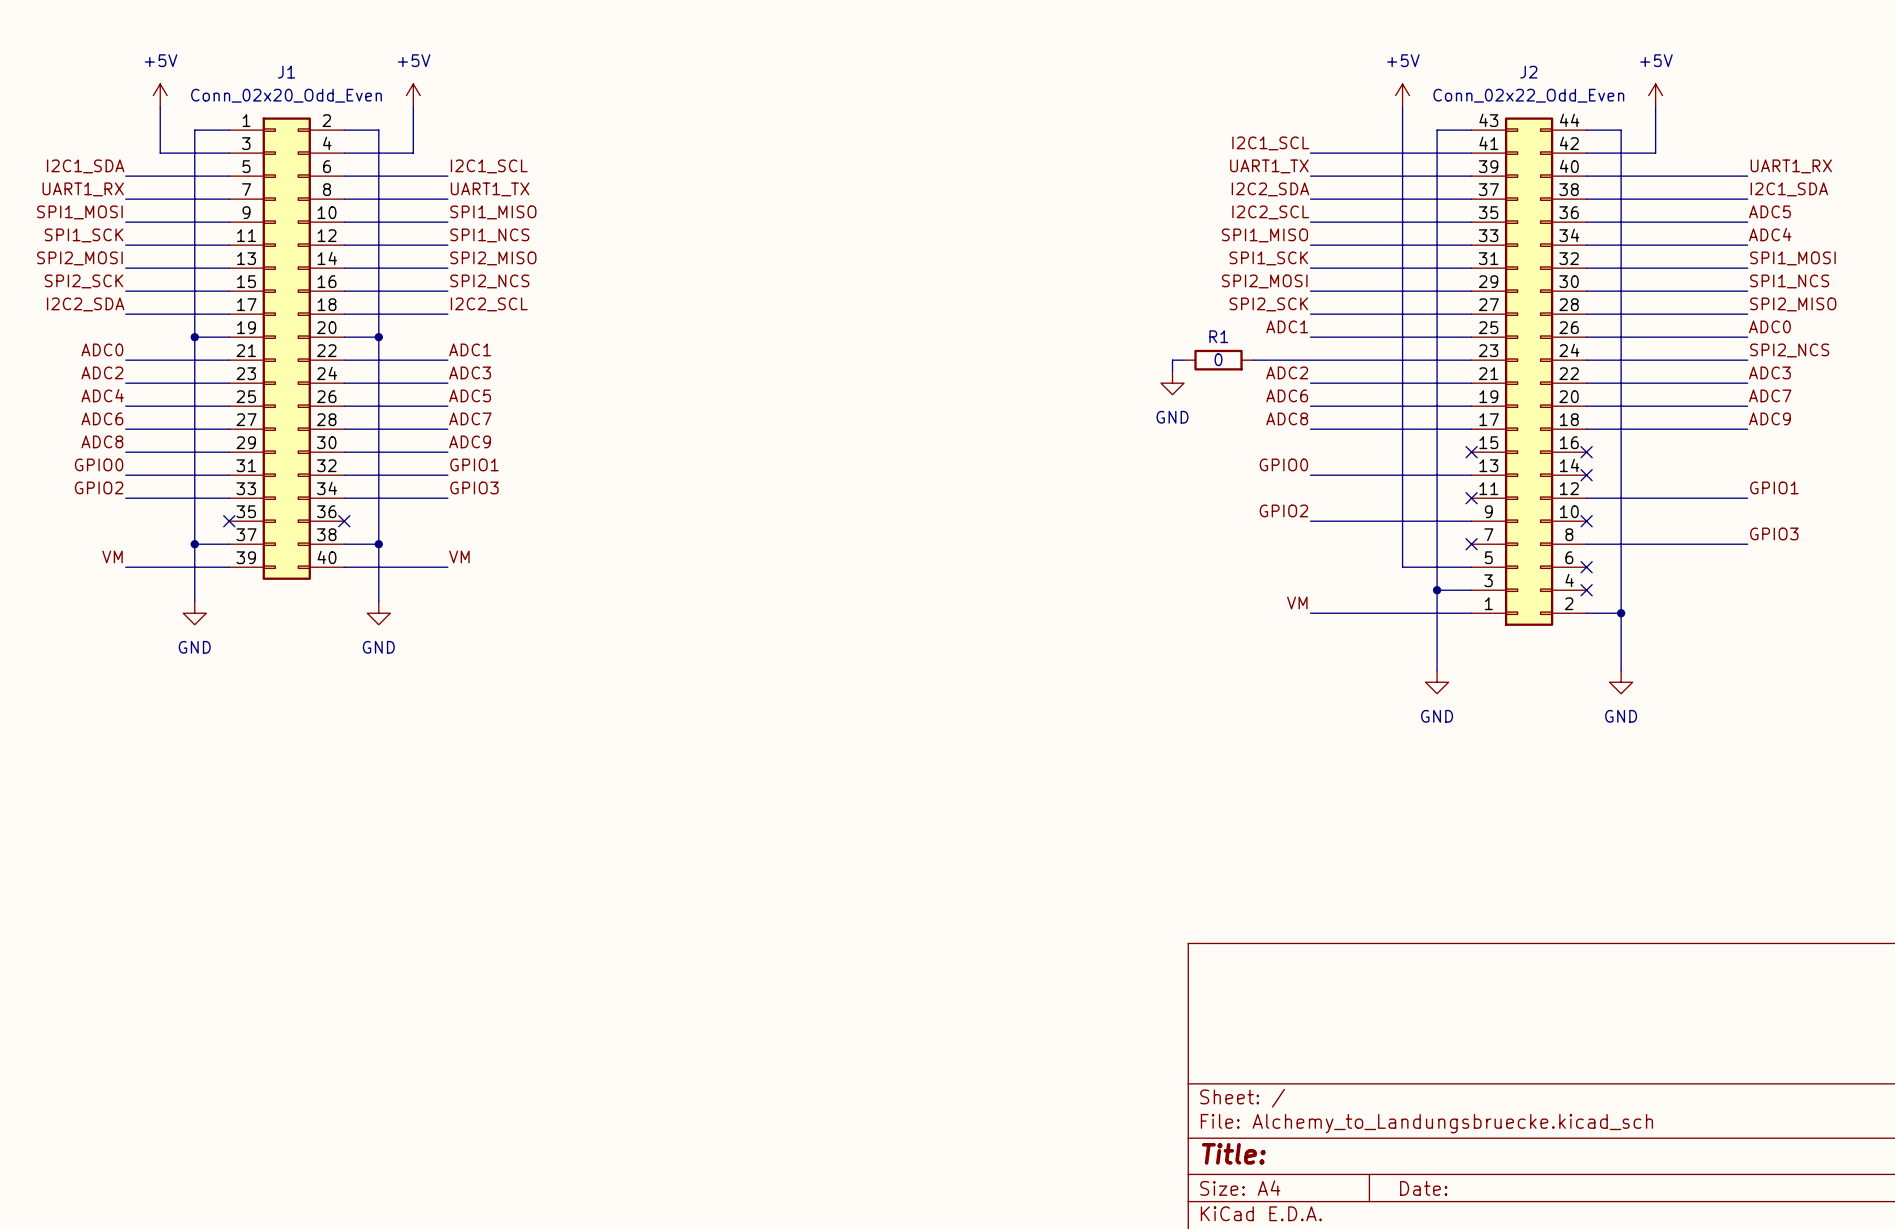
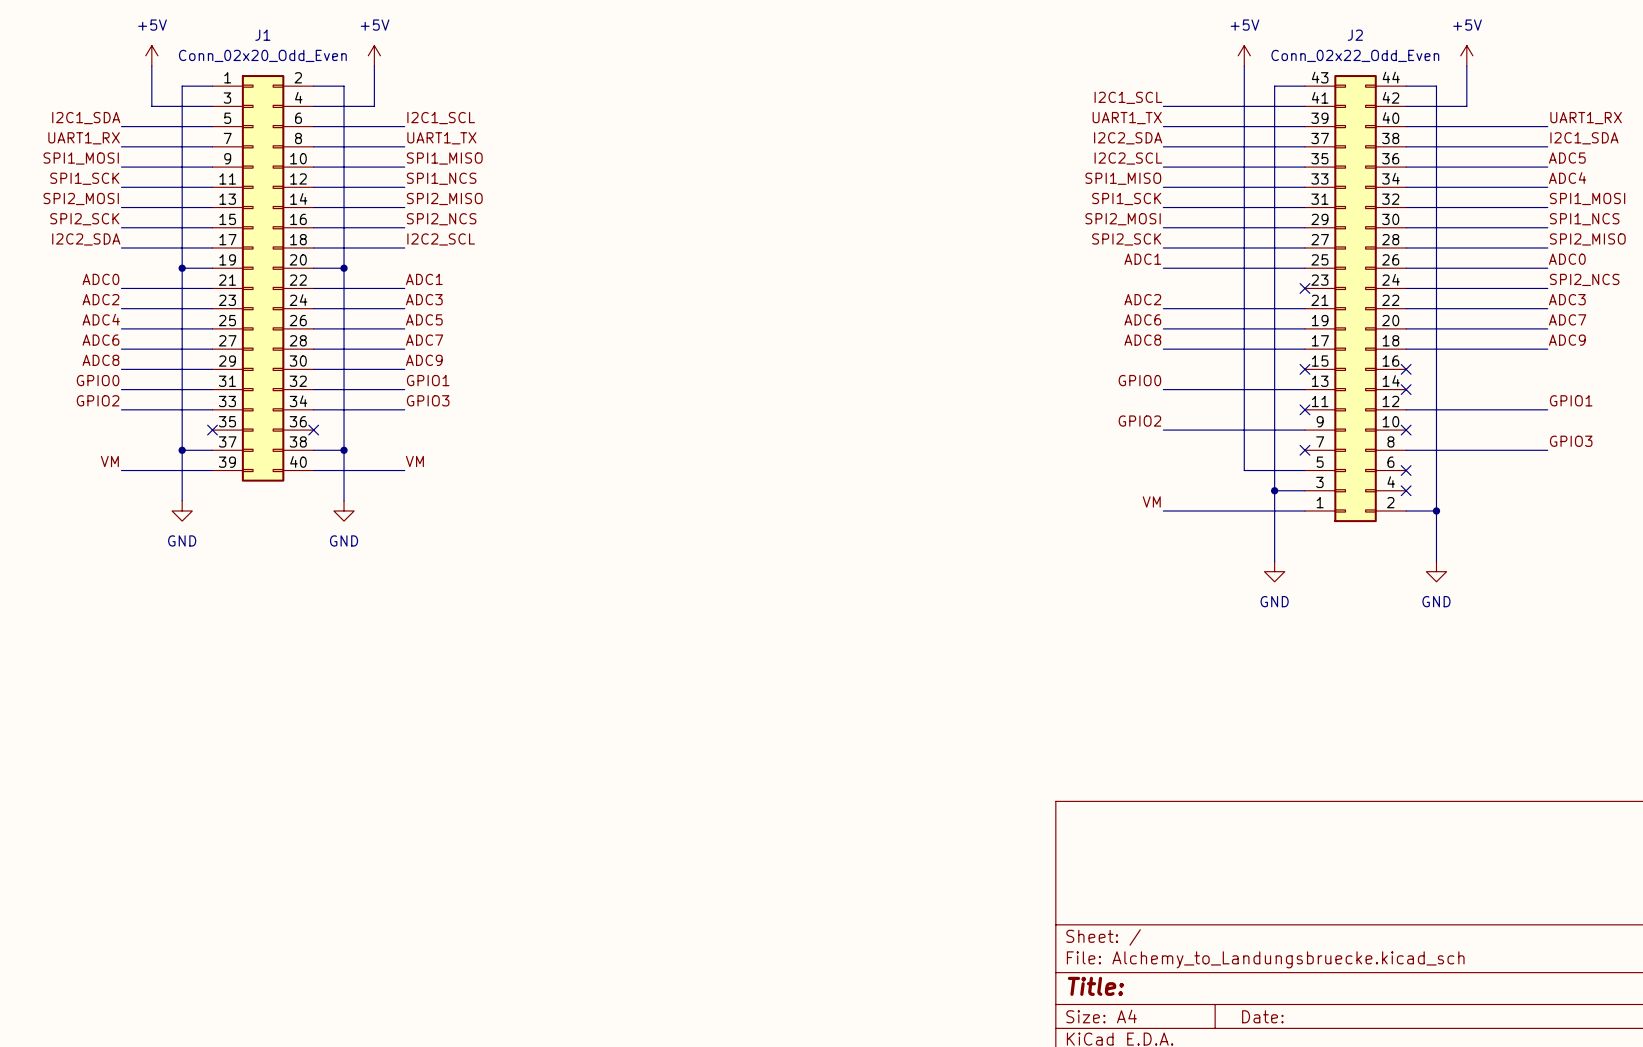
wire: (1184, 360) (1172, 360) (1172, 371) -> none
R1: 0 (1218, 360) -> none
wire: (1253, 360) (1471, 360) -> none
no-connect mark: none -> (1304, 288)
power symbol: GND (1172, 383) -> none

